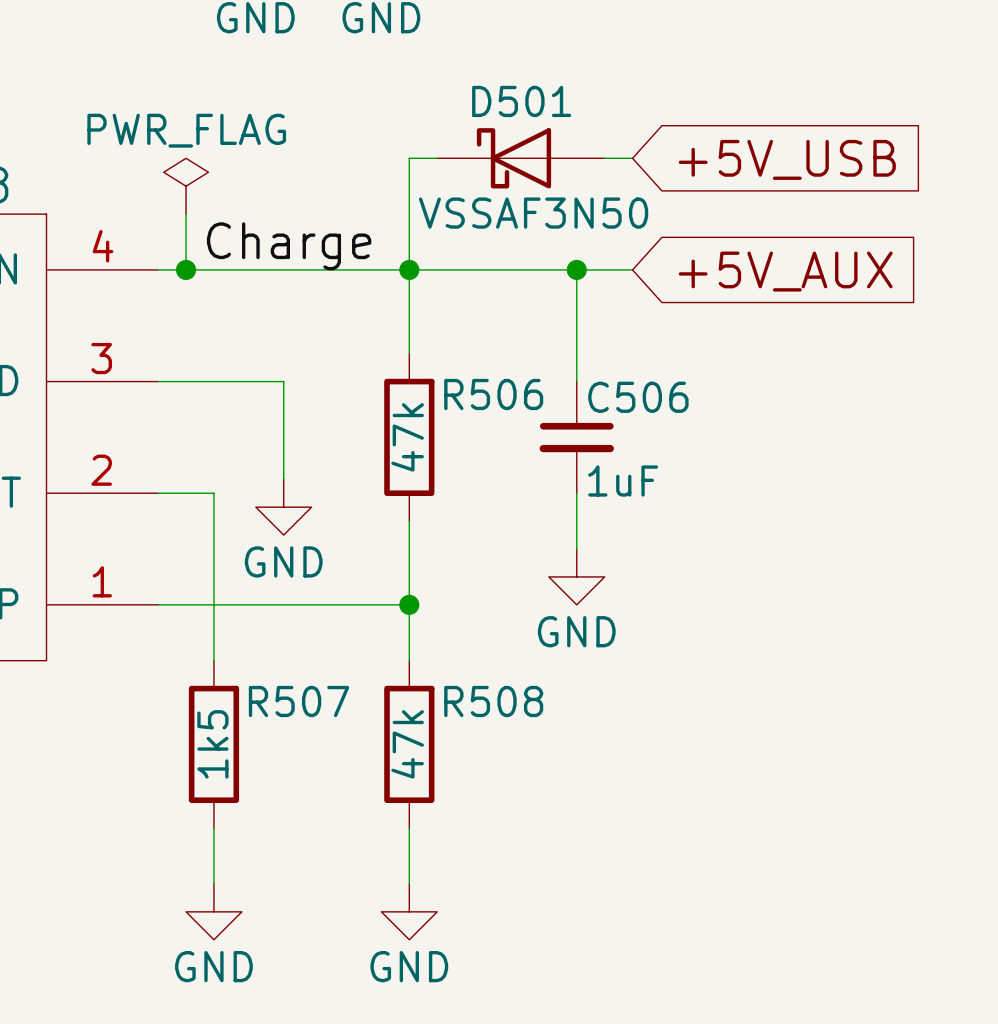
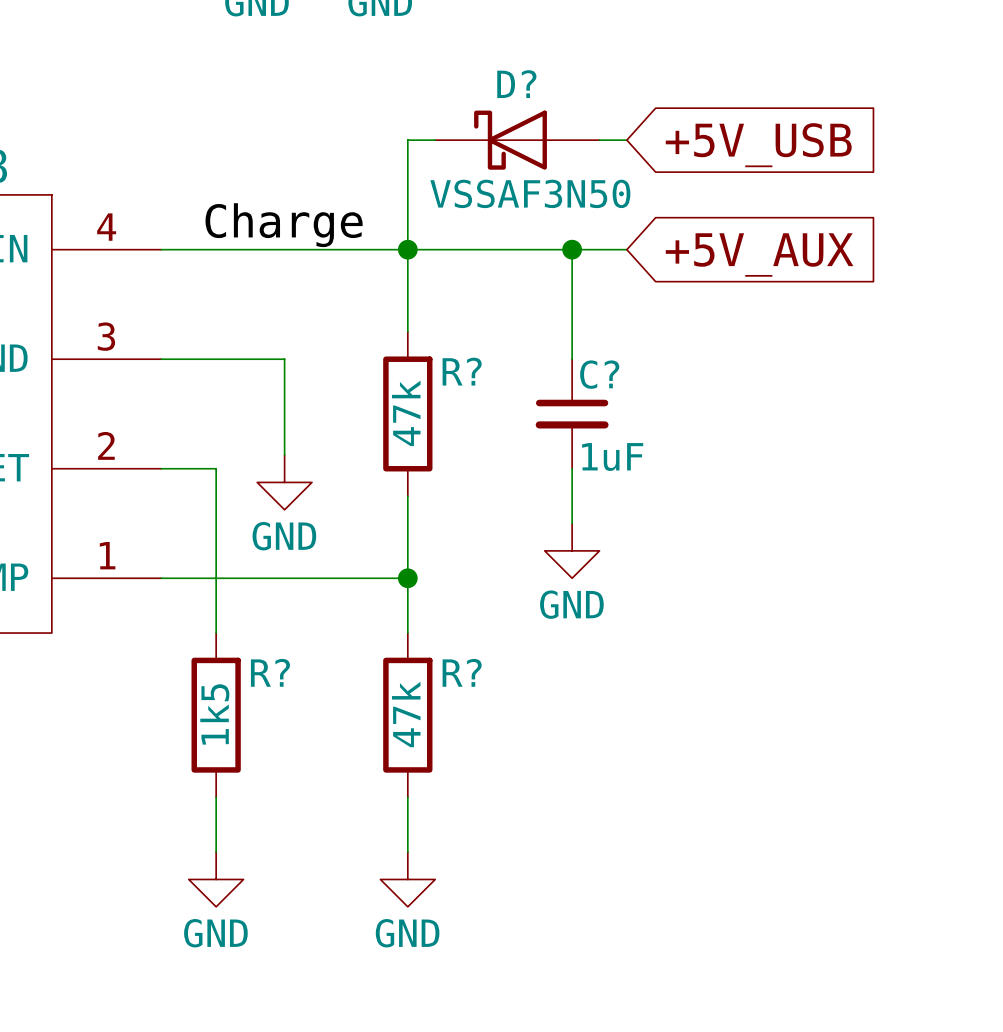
D501 name: D501 (521, 101) -> D? (516, 84)
power symbol: PWR_FLAG (186, 186) -> none
wire: (186, 214) (186, 269) -> none
junction: (186, 269) -> none
R506 name: R506 (493, 394) -> R? (462, 371)
C506 name: C506 (638, 397) -> C? (599, 374)
R507 name: R507 (299, 701) -> R? (270, 672)
R508 name: R508 (493, 701) -> R? (462, 672)

